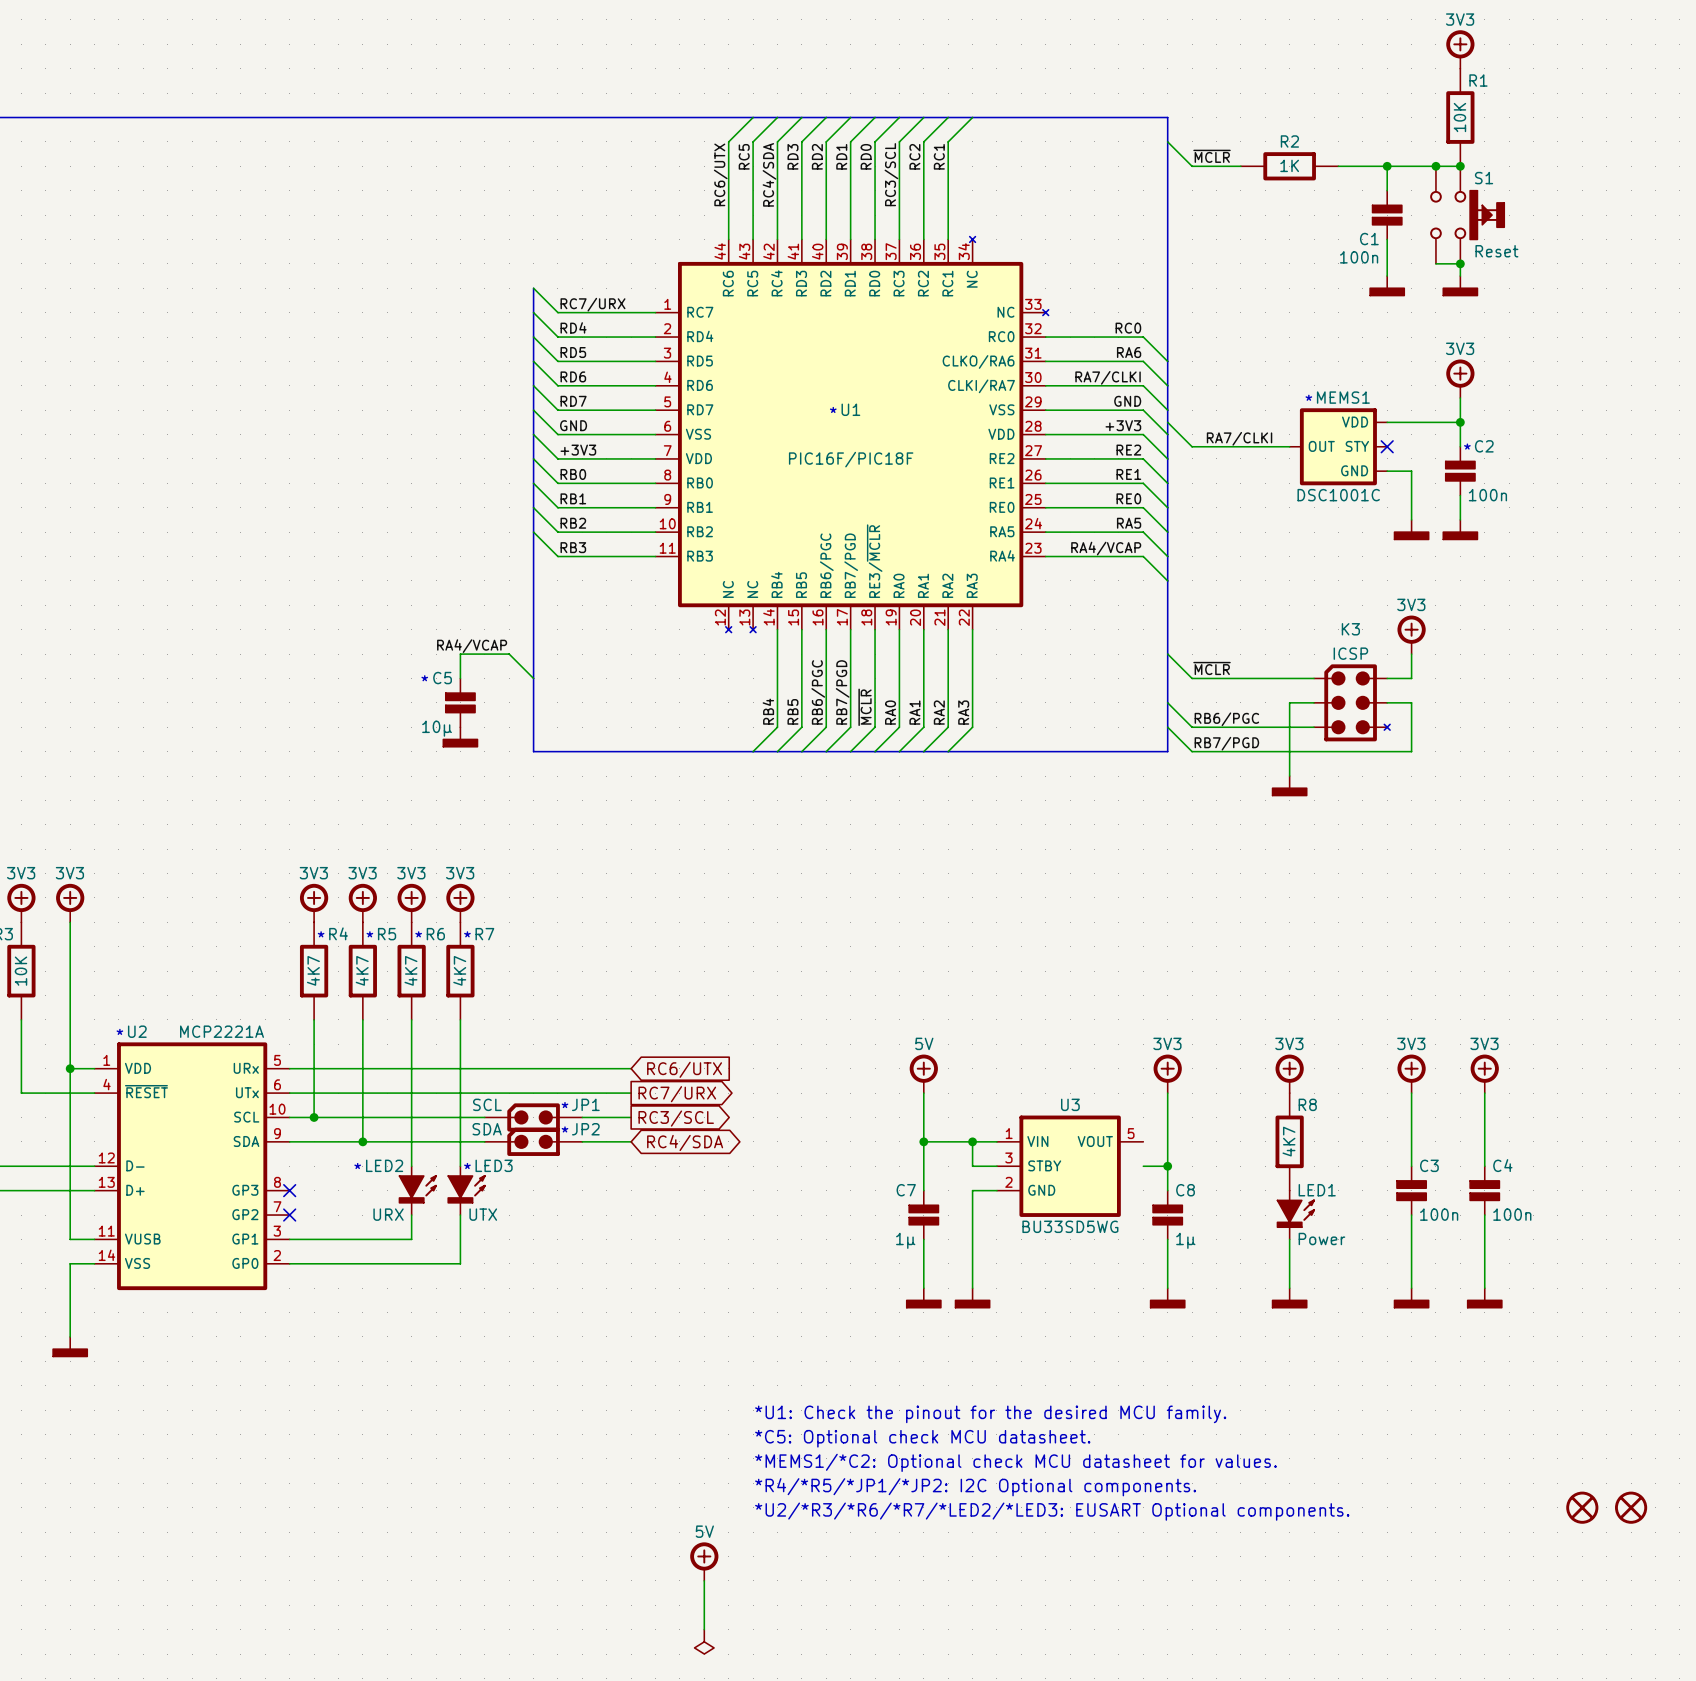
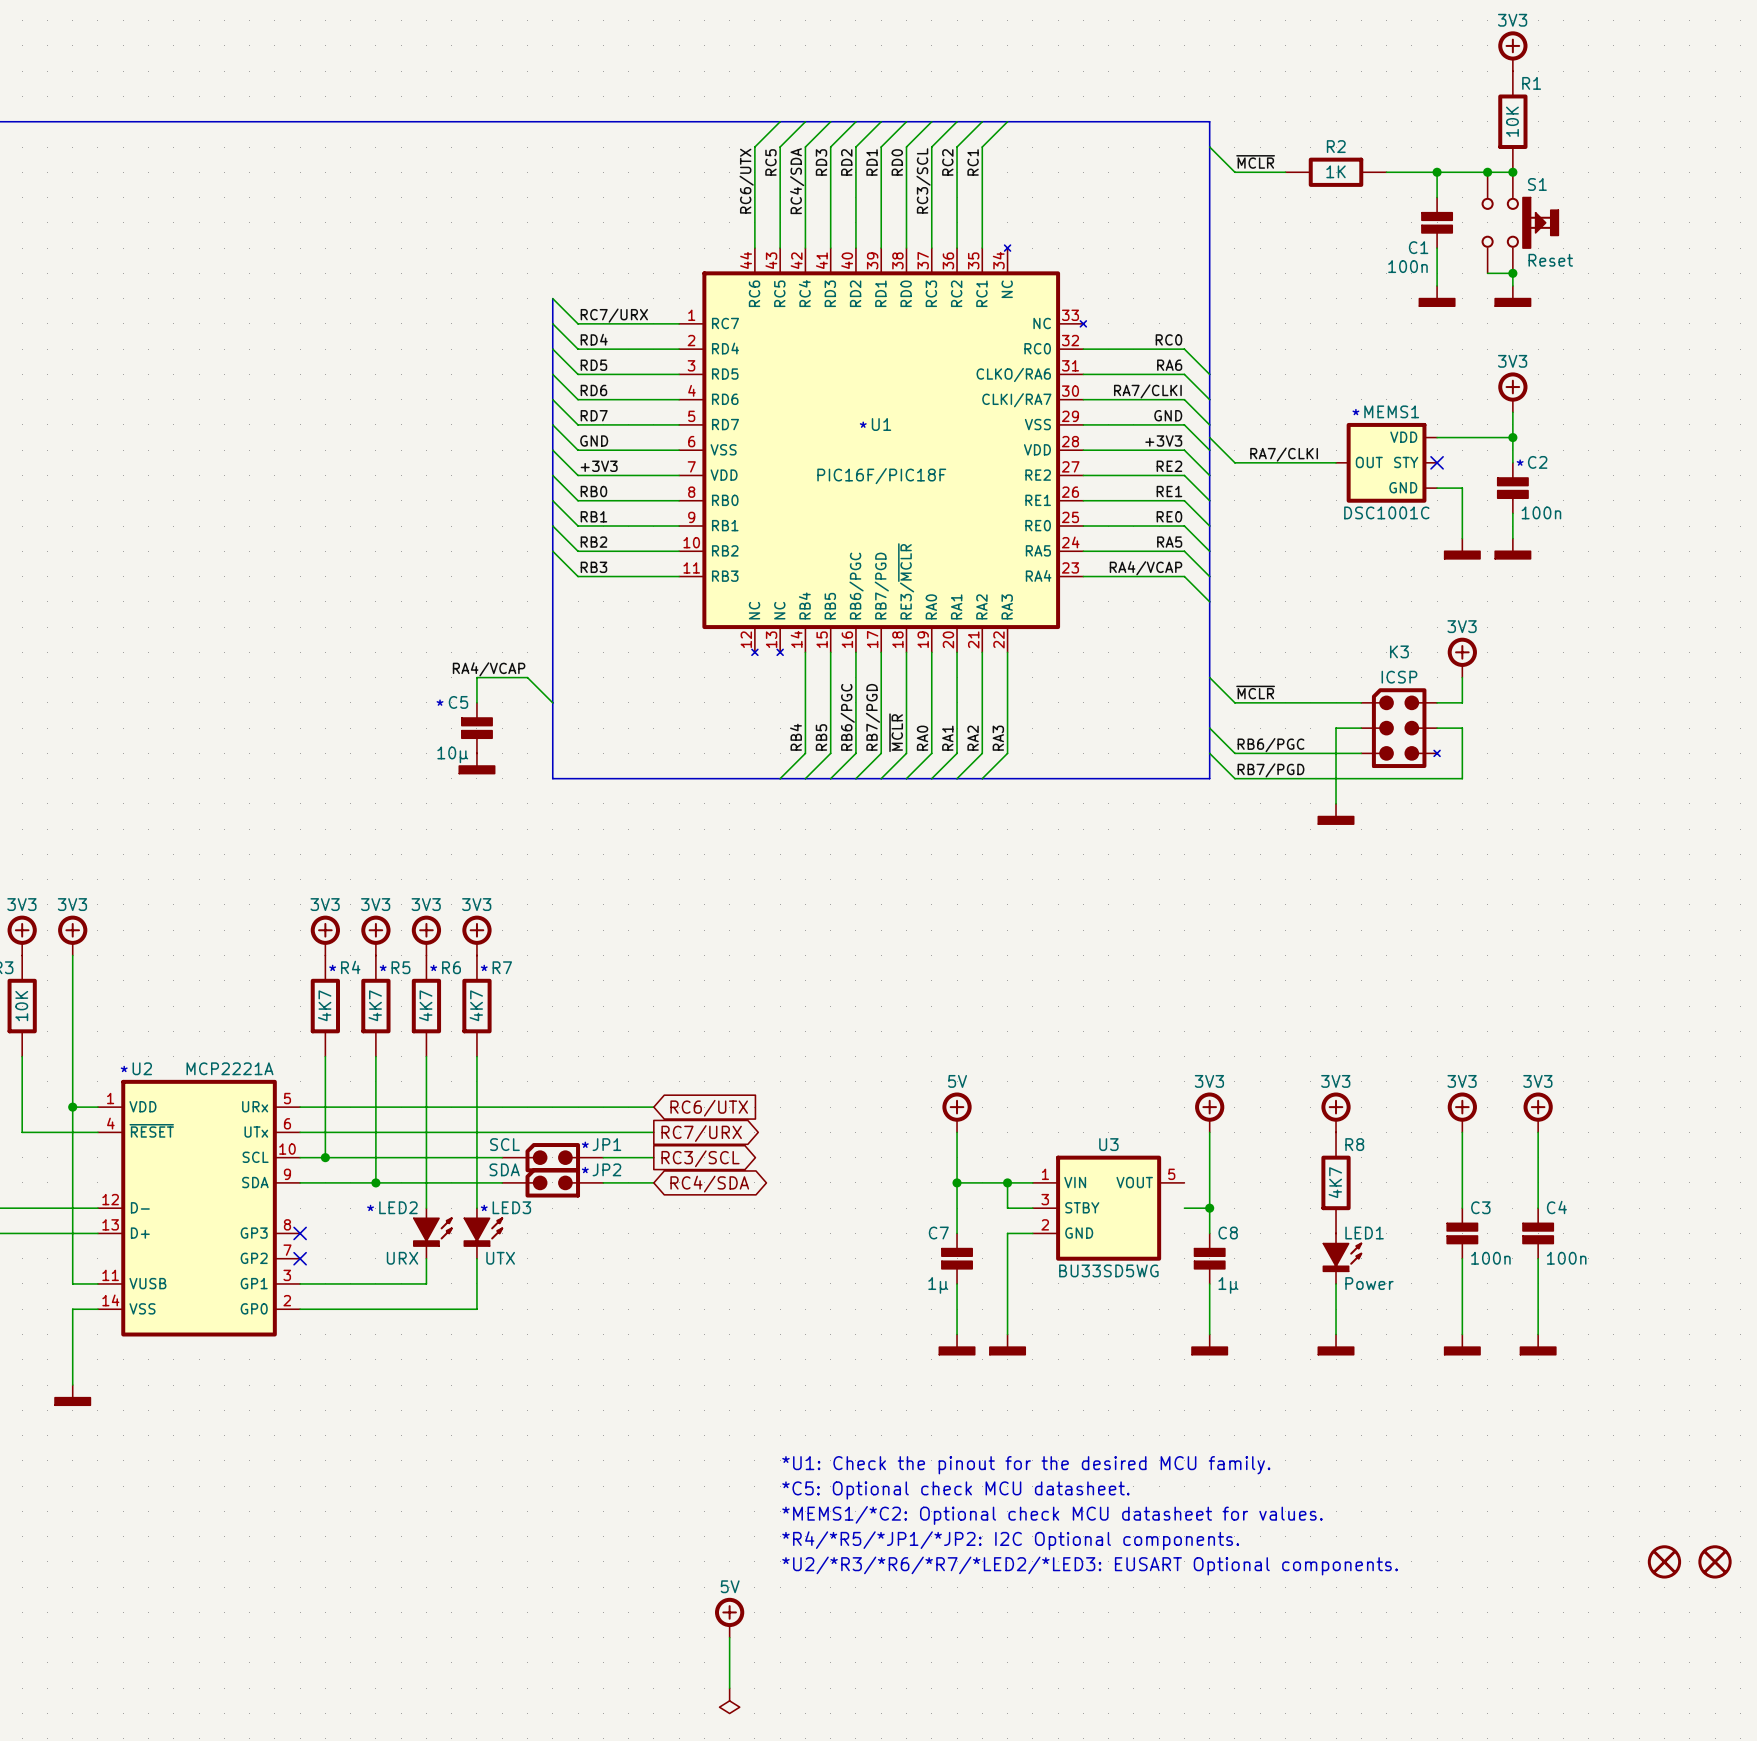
part: (1582, 1507) -> none
part: none -> (1664, 1561)
part: (1631, 1507) -> none
part: none -> (1715, 1561)

